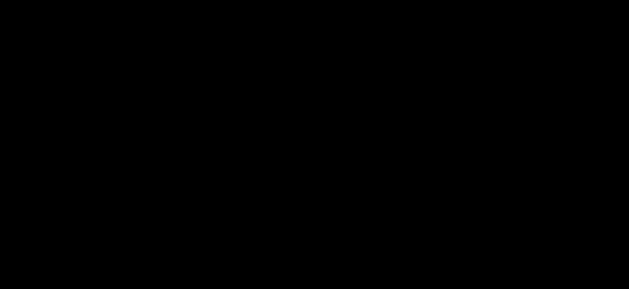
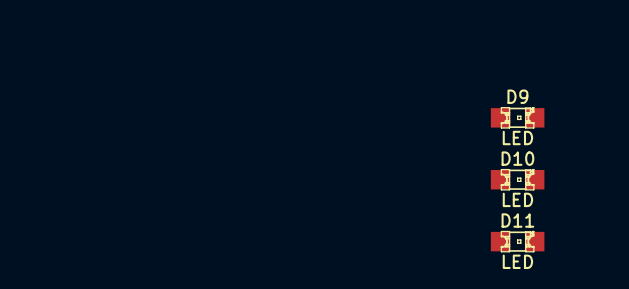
D9: none -> LED (517, 117)
D10: none -> LED (517, 179)
D11: none -> LED (517, 241)

